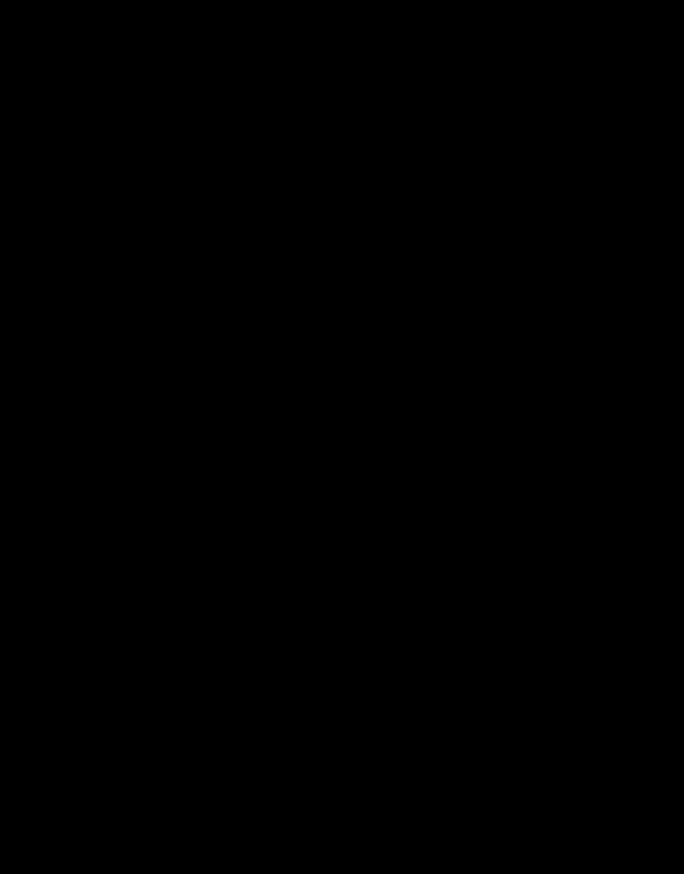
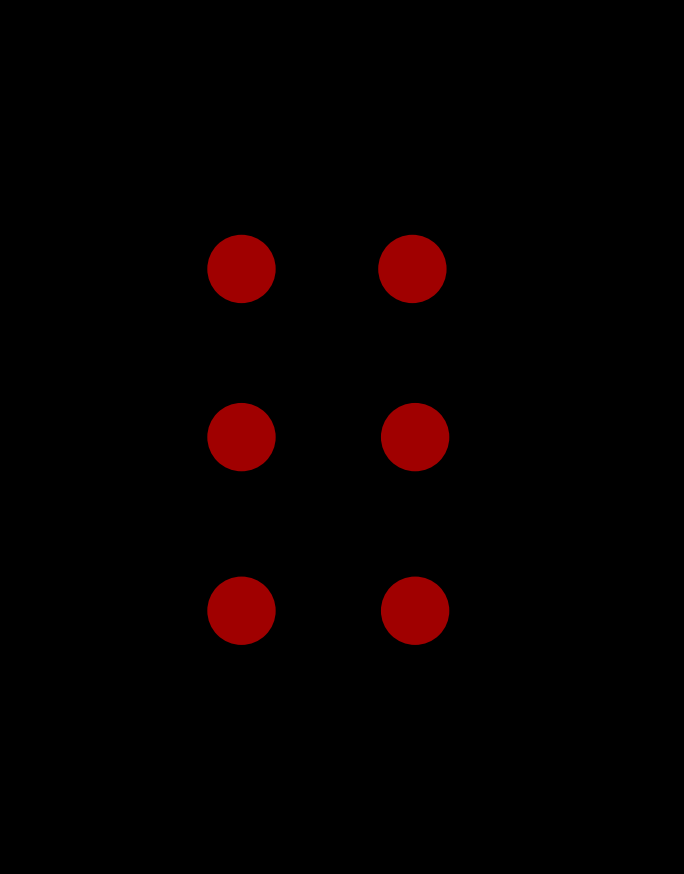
part: none -> (241, 268)
part: none -> (412, 268)
part: none -> (241, 437)
part: none -> (415, 437)
part: none -> (241, 610)
part: none -> (415, 610)

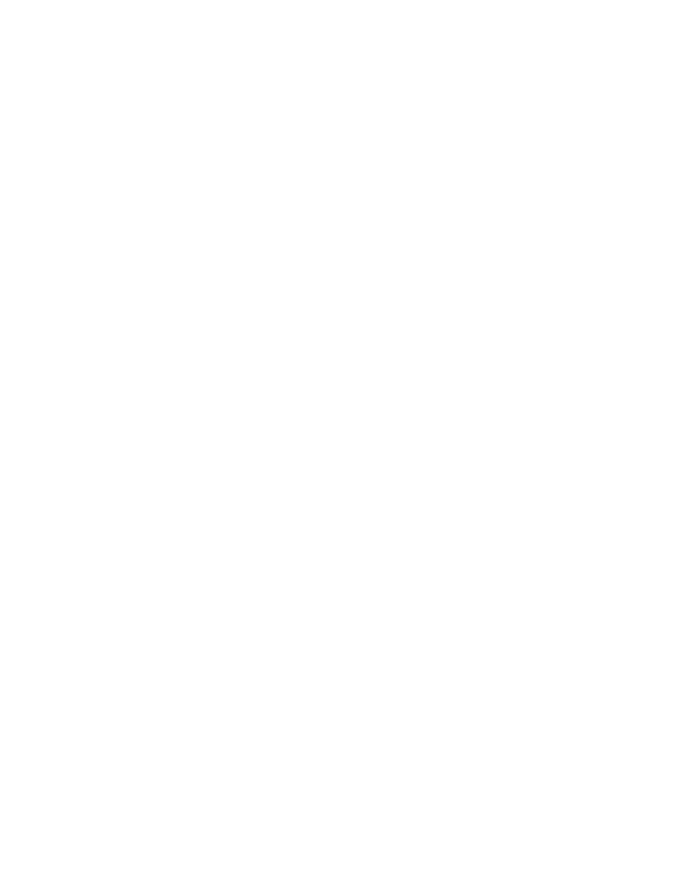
part: (241, 268) -> none
part: (412, 268) -> none
part: (241, 437) -> none
part: (415, 437) -> none
part: (241, 610) -> none
part: (415, 610) -> none

